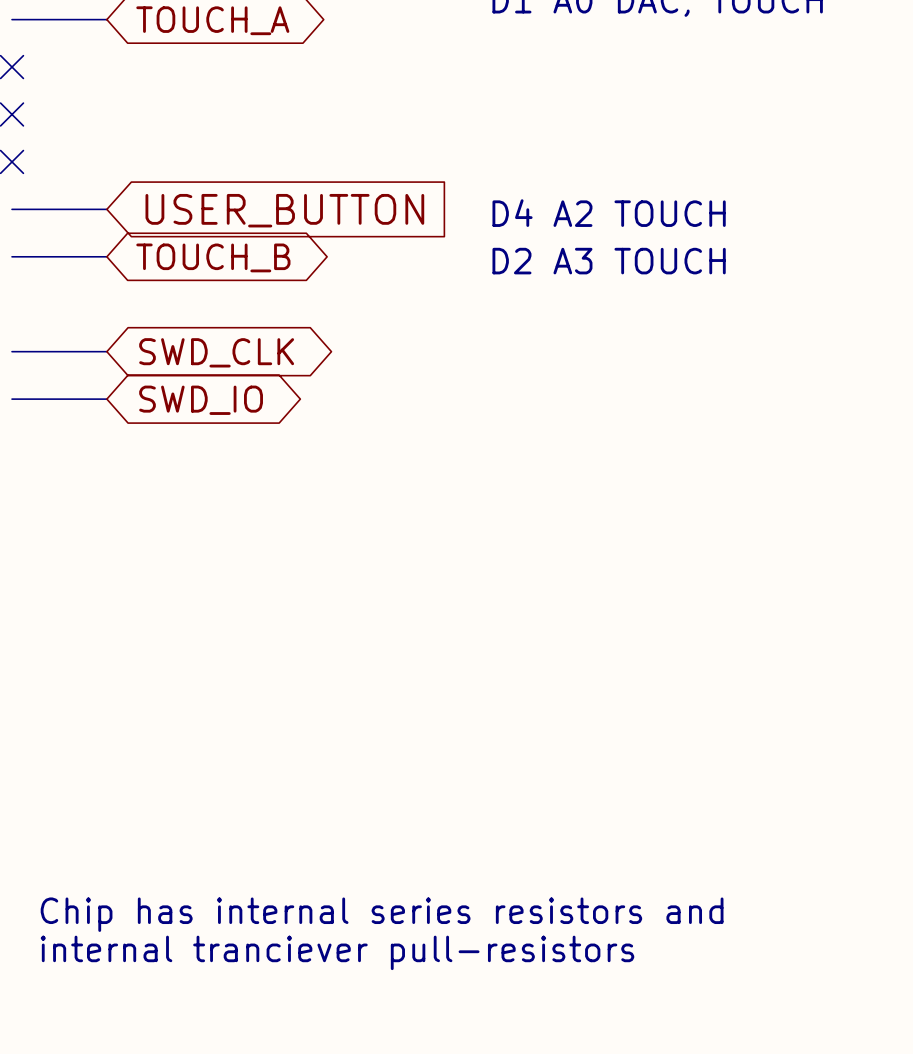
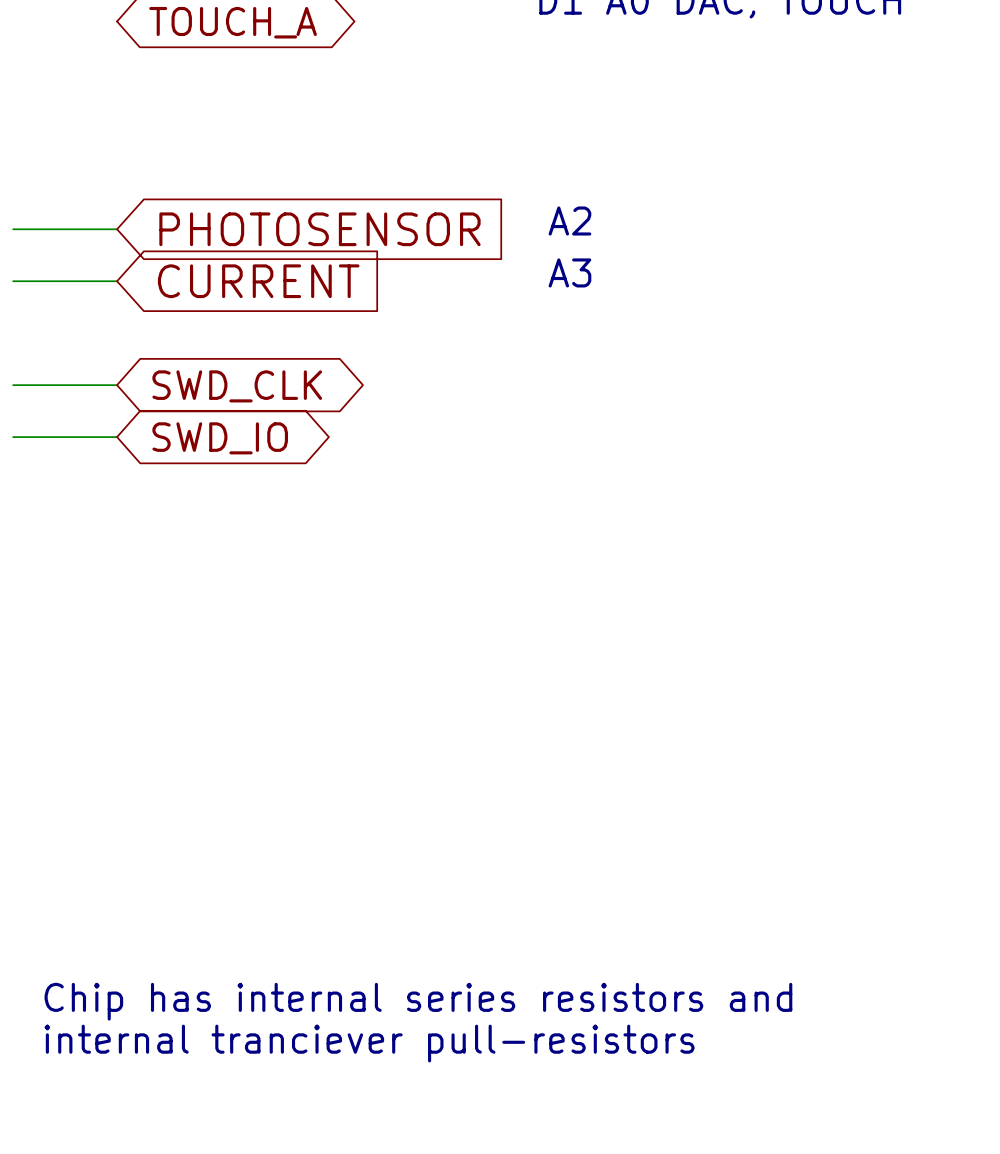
wire: (12, 19) (106, 19) -> none
no-connect mark: (12, 67) -> none
no-connect mark: (12, 114) -> none
no-connect mark: (12, 161) -> none
global label: USER_BUTTON (284, 210) -> PHOTOSENSOR (319, 229)
text: D4 A2 TOUCH (609, 213) -> A2 (569, 220)
global label shape: bidirectional (213, 257) -> input (258, 281)
global label: TOUCH_B (213, 257) -> CURRENT (258, 281)
text: D2 A3 TOUCH (609, 261) -> A3 (569, 272)

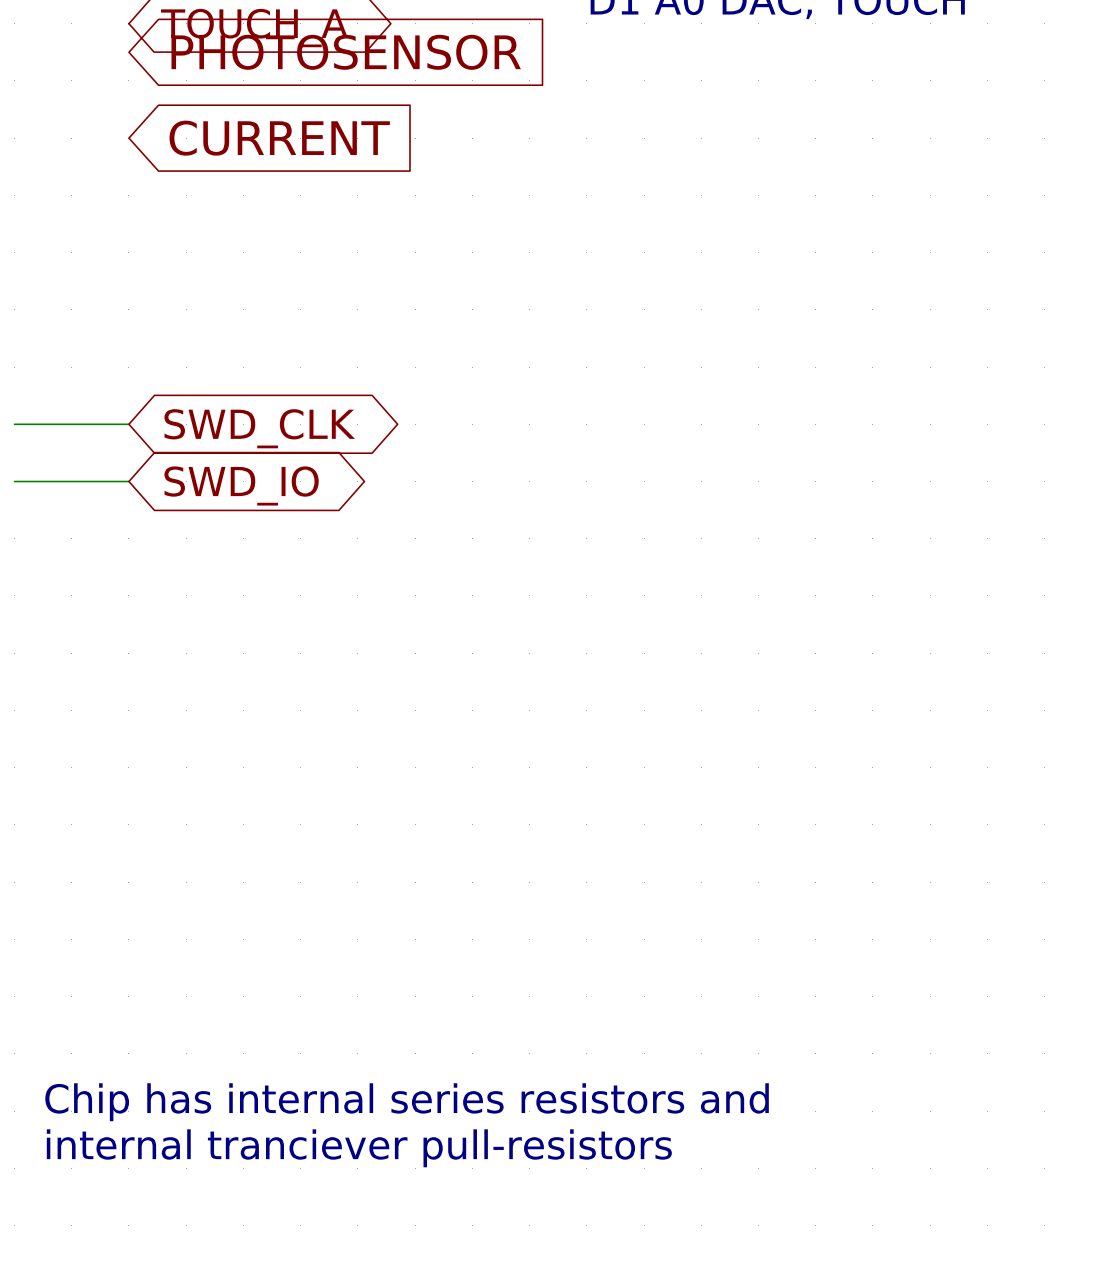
text: A2 (569, 220) -> none
wire: (13, 229) (117, 229) -> none
global label position: PHOTOSENSOR (319, 229) -> PHOTOSENSOR (346, 52)
text: A3 (569, 272) -> none
wire: (13, 281) (117, 281) -> none
global label position: CURRENT (258, 281) -> CURRENT (279, 138)

